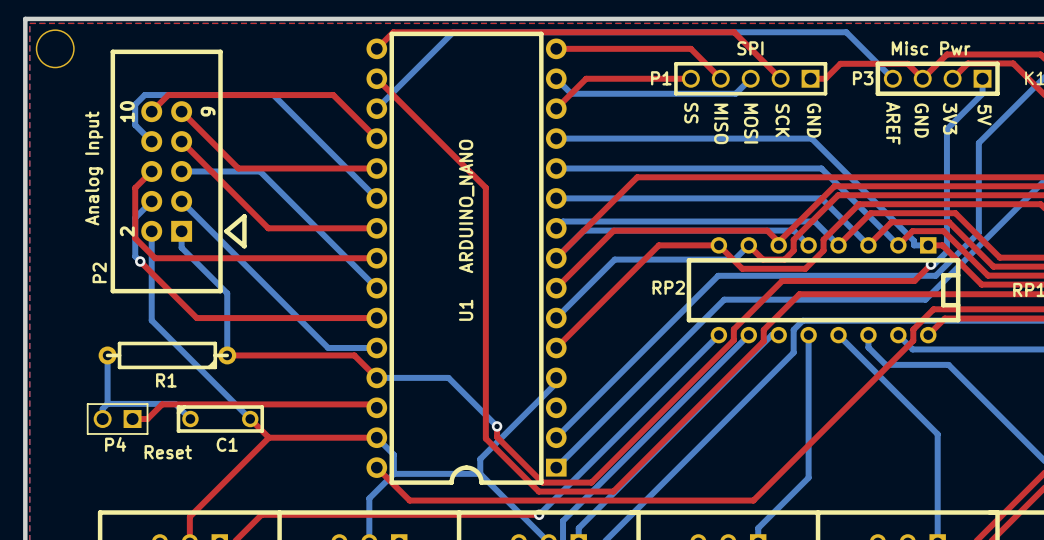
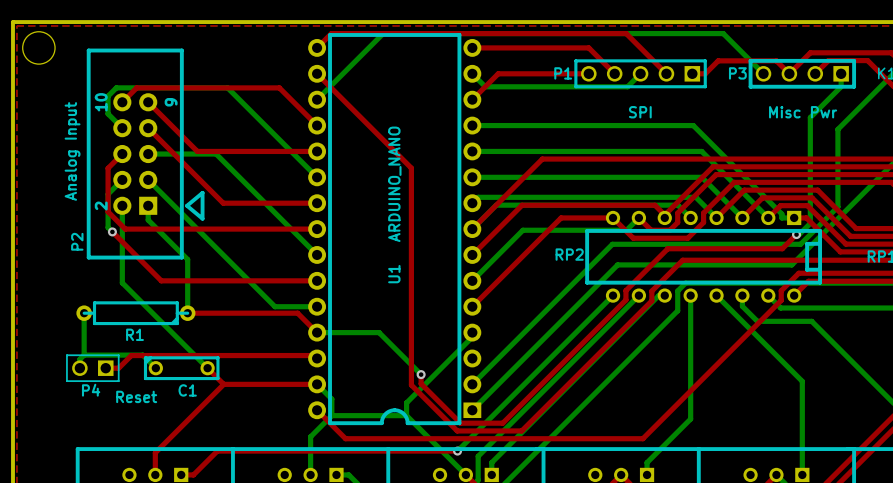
text: SPI (750, 48) -> none
text position: Misc Pwr (931, 48) -> Misc Pwr (803, 112)
text: SS (691, 113) -> none
text: 5V (984, 115) -> none
text: 3V3 (950, 118) -> none
text: SCK (782, 120) -> none
text: GND (813, 120) -> none
text: GND (921, 120) -> none
text: MISO (721, 123) -> none
text: MOSI (751, 123) -> SPI (640, 112)
text: AREF (893, 123) -> none

